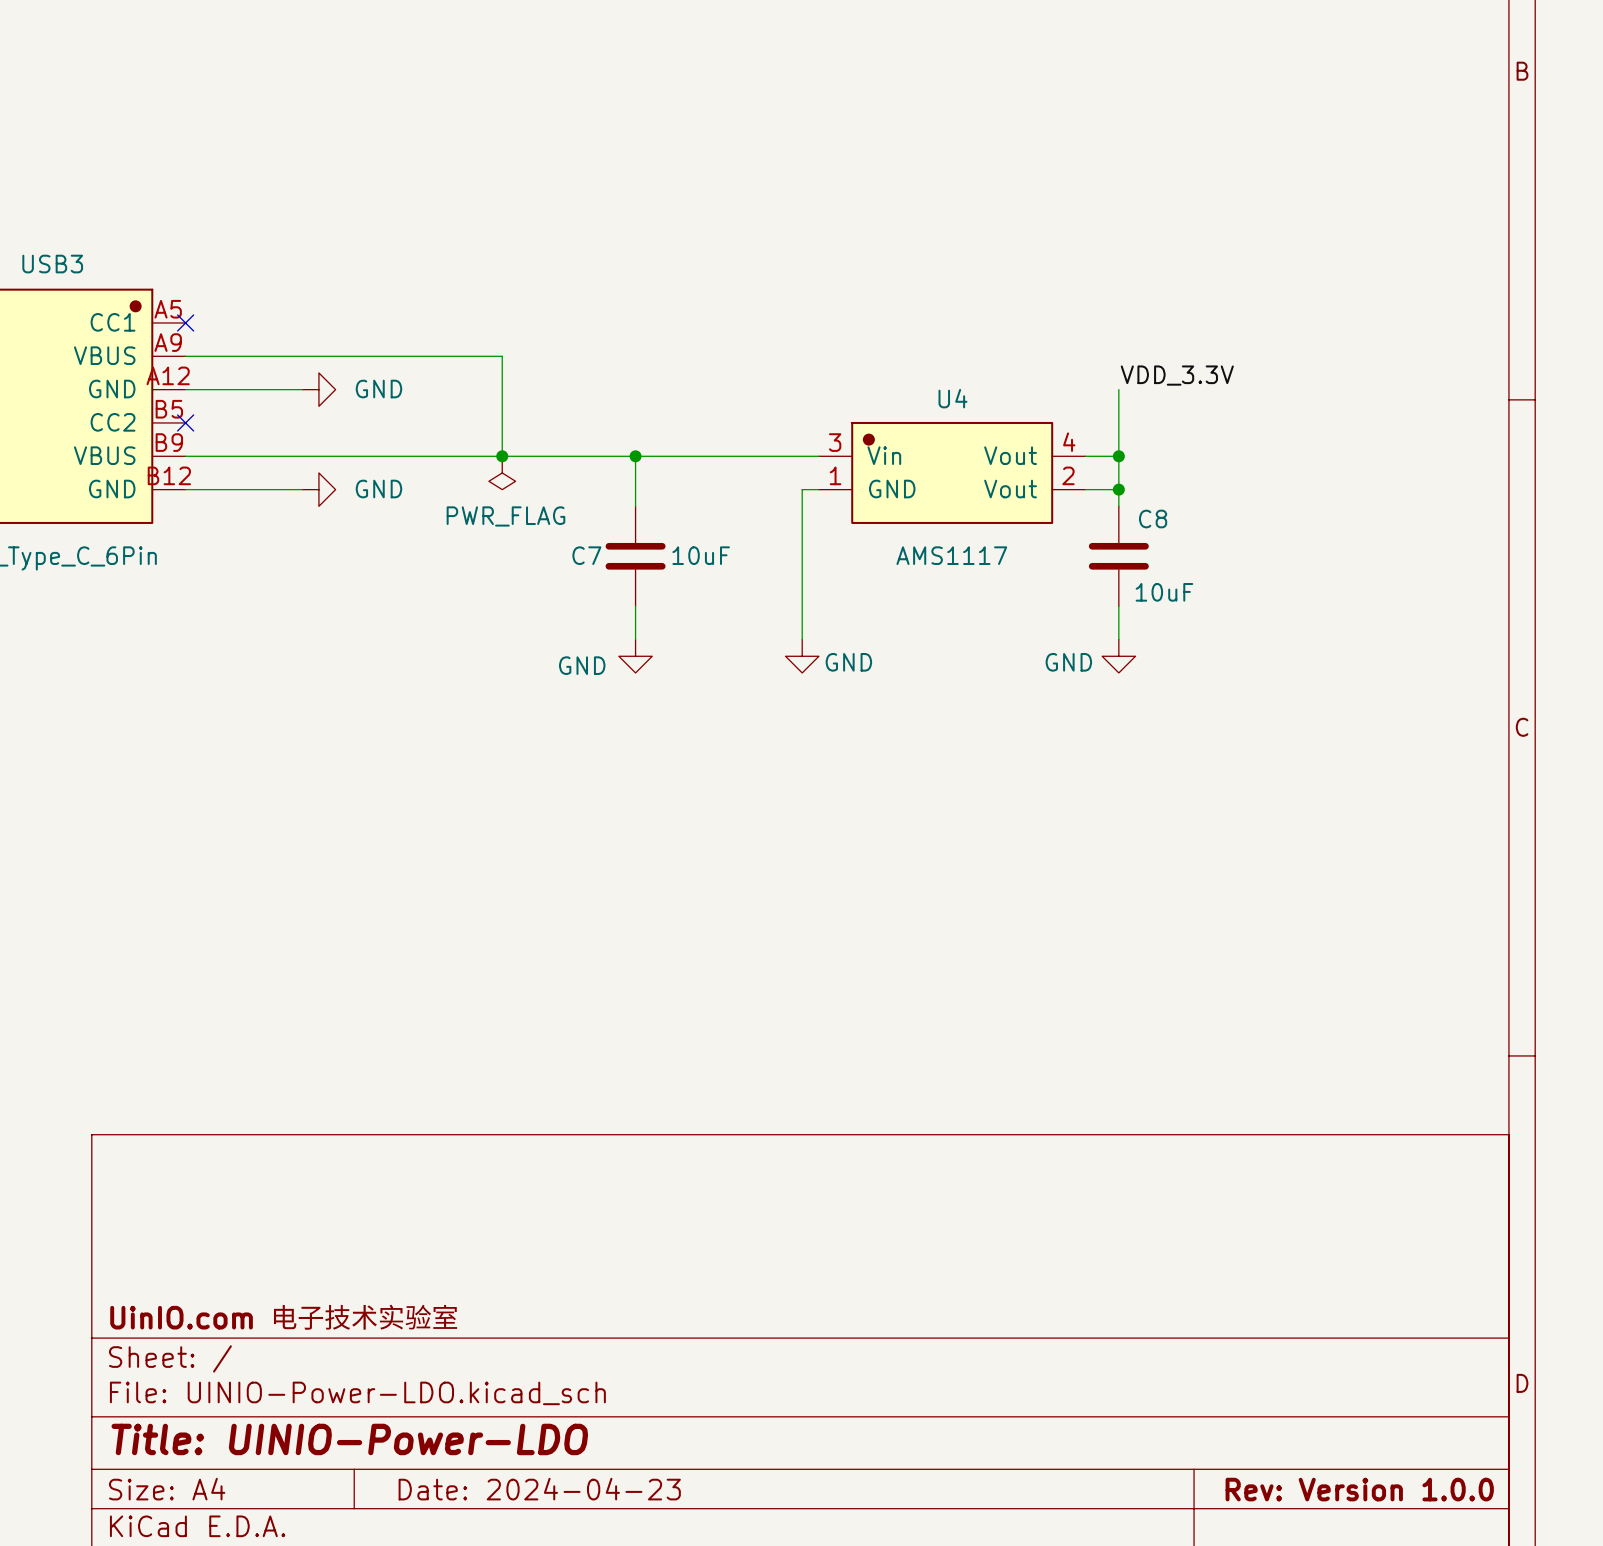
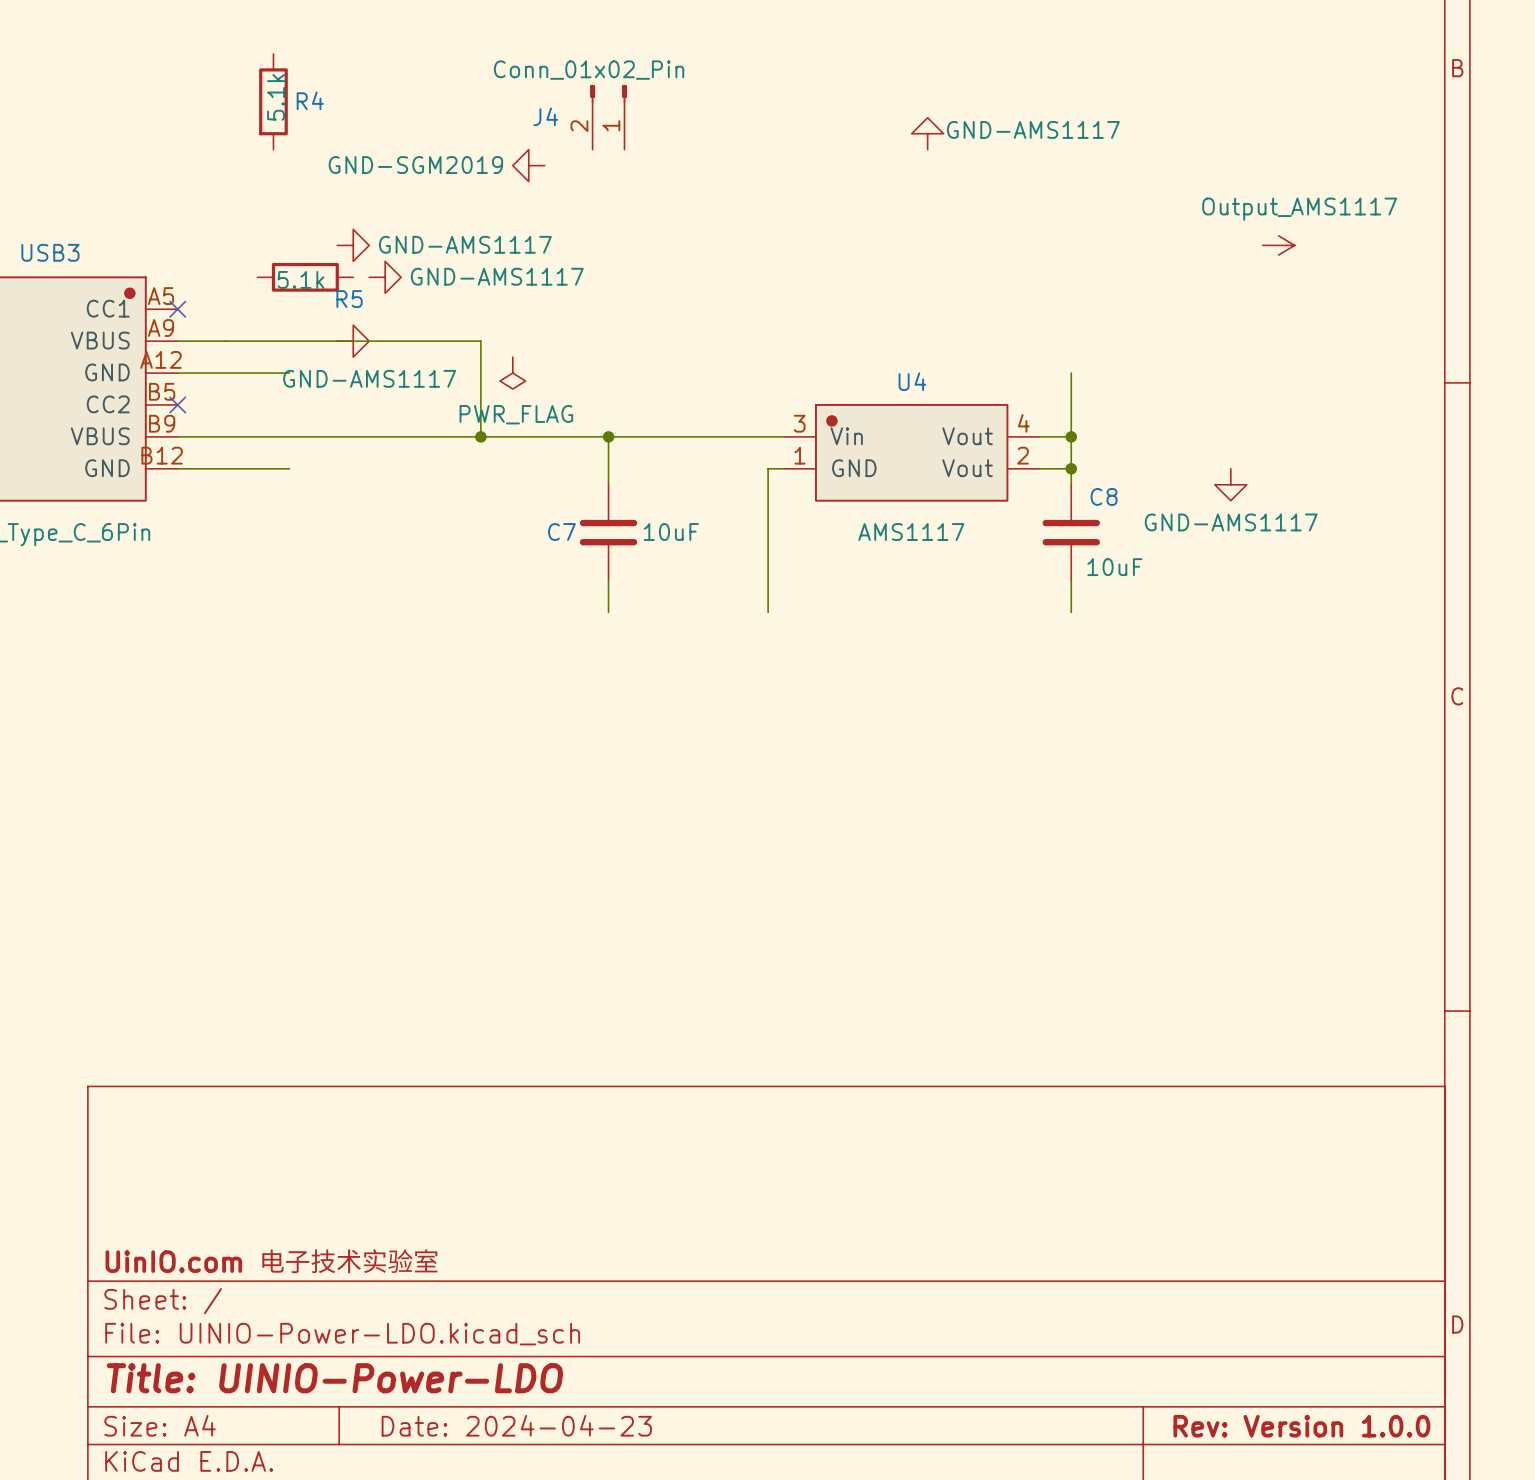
R4: none -> 5.1k (273, 101)
J4: none -> Conn_01x02_Pin (608, 117)
power symbol: none -> GND-AMS1117 (927, 133)
power symbol: none -> GND-SGM2019 (528, 165)
power symbol: none -> GND-AMS1117 (353, 245)
power symbol: none -> Output_AMS1117 (1278, 245)
R5: none -> 5.1k (305, 277)
power symbol: none -> GND-AMS1117 (385, 277)
power symbol: none -> GND-AMS1117 (353, 341)
label: VDD_3.3V (1177, 375) -> none
power symbol: GND (318, 389) -> none
power symbol position: PWR_FLAG (502, 472) -> PWR_FLAG (512, 373)
power symbol: GND (318, 489) -> none
power symbol: none -> GND-AMS1117 (1230, 484)
power symbol: GND (635, 656) -> none
power symbol: GND (802, 656) -> none
power symbol: GND (1118, 656) -> none

